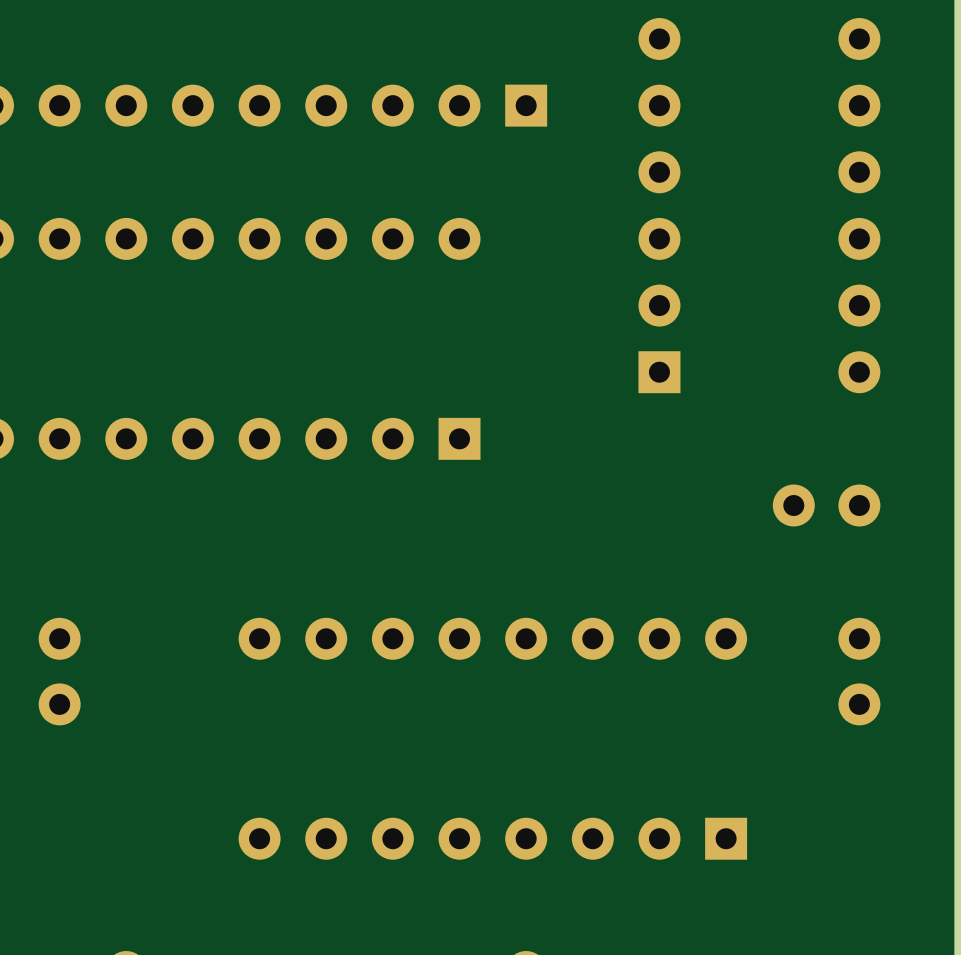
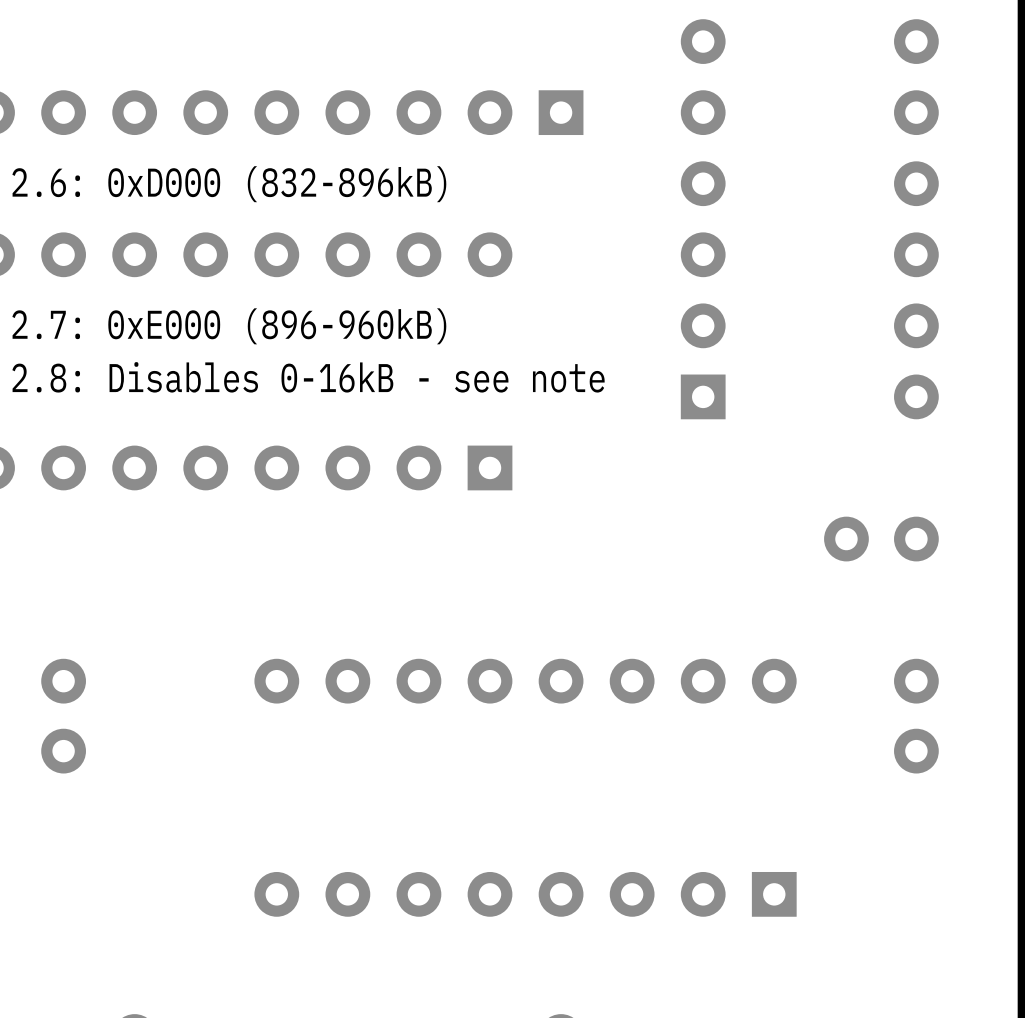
text: none -> 2.6: 0xD000 (832-896kB) (229, 184)
text: none -> 2.7: 0xE000 (896-960kB) (229, 326)
text: none -> 2.8: Disables 0-16kB - see note (308, 377)

